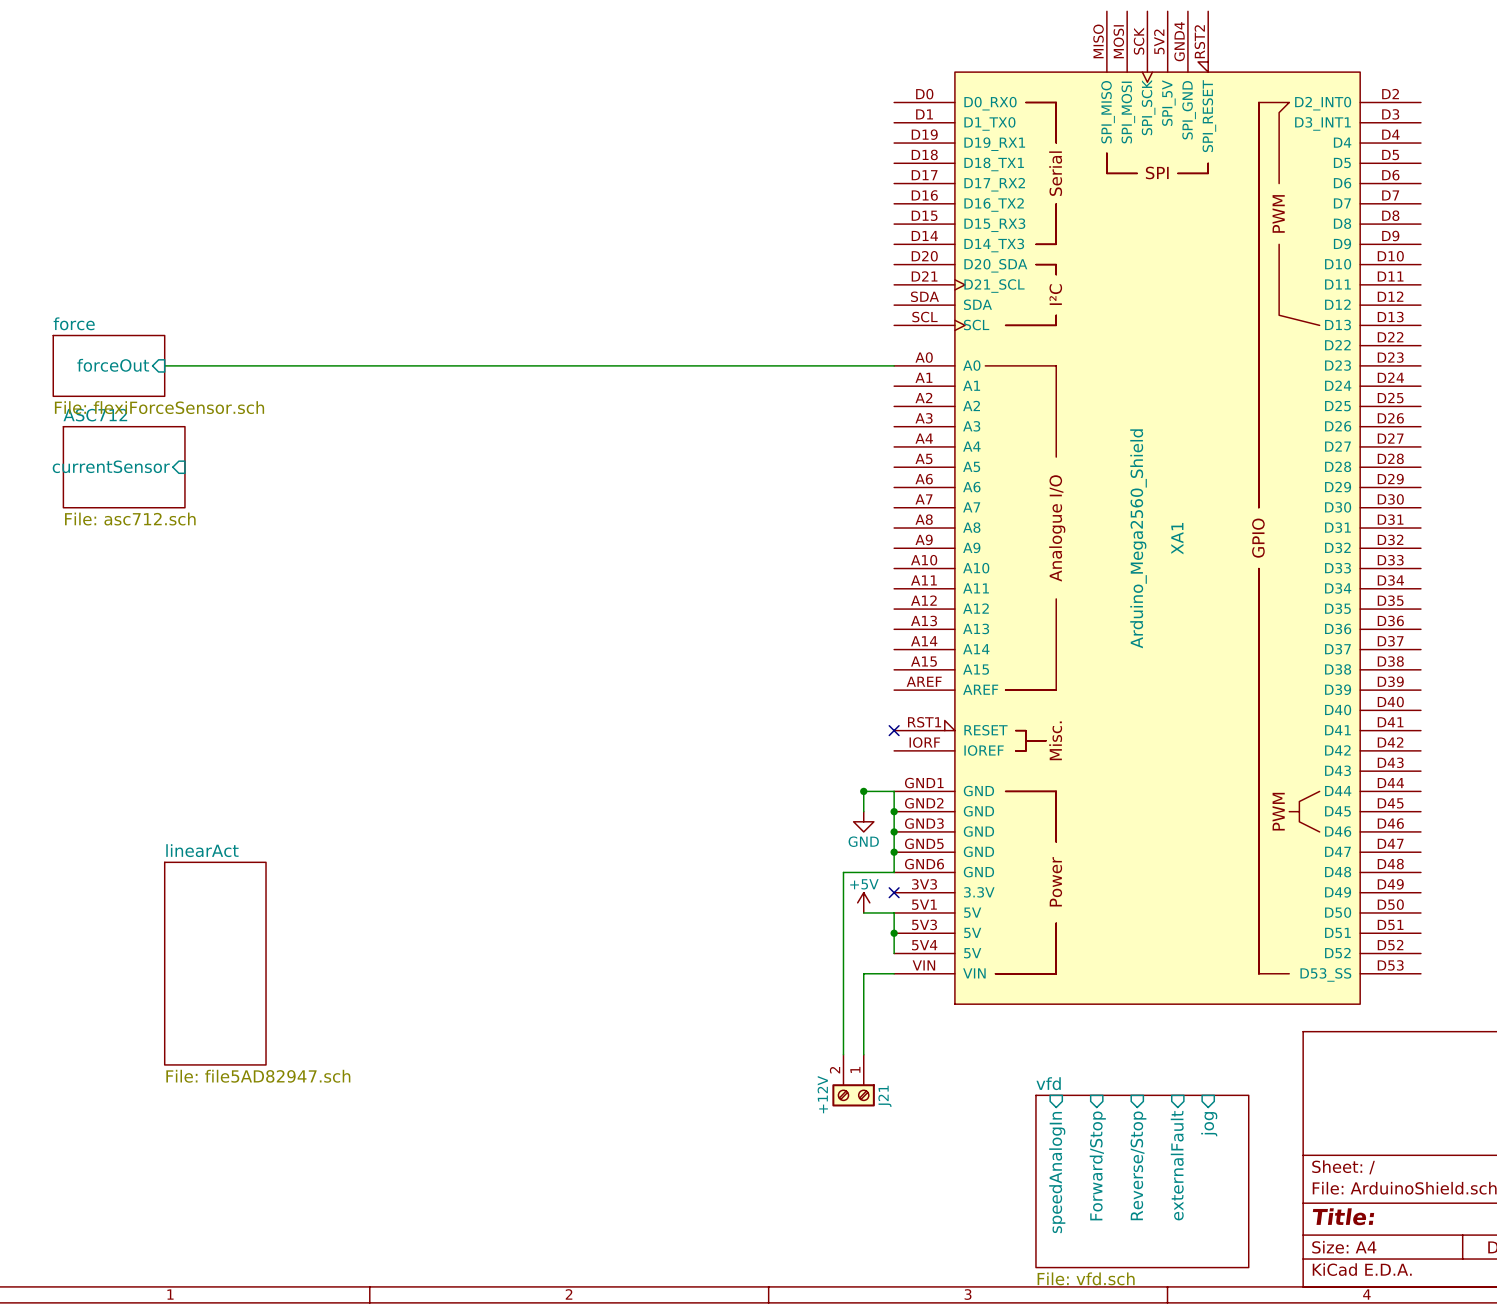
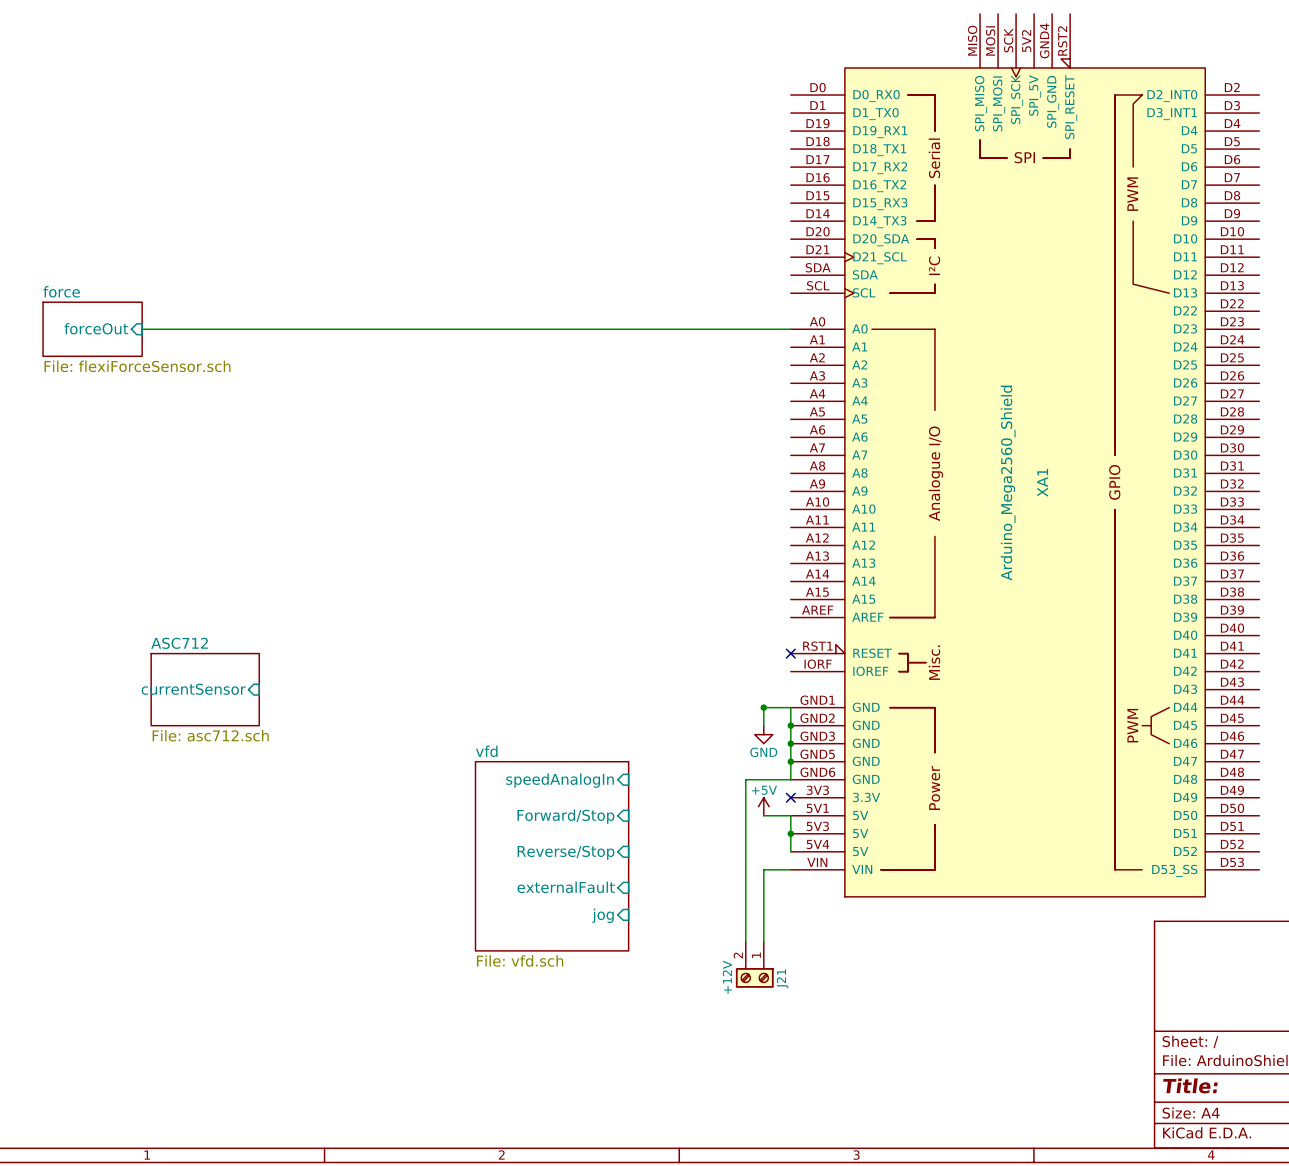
sheet pin: currentSensor (111, 466) -> none
sheet ASC712 position: (124, 467) -> (205, 689)
sheet pin: none -> currentSensor (193, 689)
sheet pin: none -> speedAnalogIn (560, 780)
sheet pin: none -> Forward/Stop (565, 816)
sheet pin: none -> Reverse/Stop (565, 852)
sheet vfd: none -> File: vfd.sch (552, 856)
sheet linearAct: File: file5AD82947.sch (215, 963) -> none
sheet pin: none -> externalFault (566, 887)
sheet pin: none -> jog (603, 915)
sheet pin: jog (1209, 1124) -> none
sheet pin: Forward/Stop (1097, 1165) -> none
sheet pin: Reverse/Stop (1138, 1165) -> none
sheet pin: externalFault (1177, 1165) -> none
sheet pin: speedAnalogIn (1057, 1172) -> none
sheet vfd: File: vfd.sch (1142, 1181) -> none

